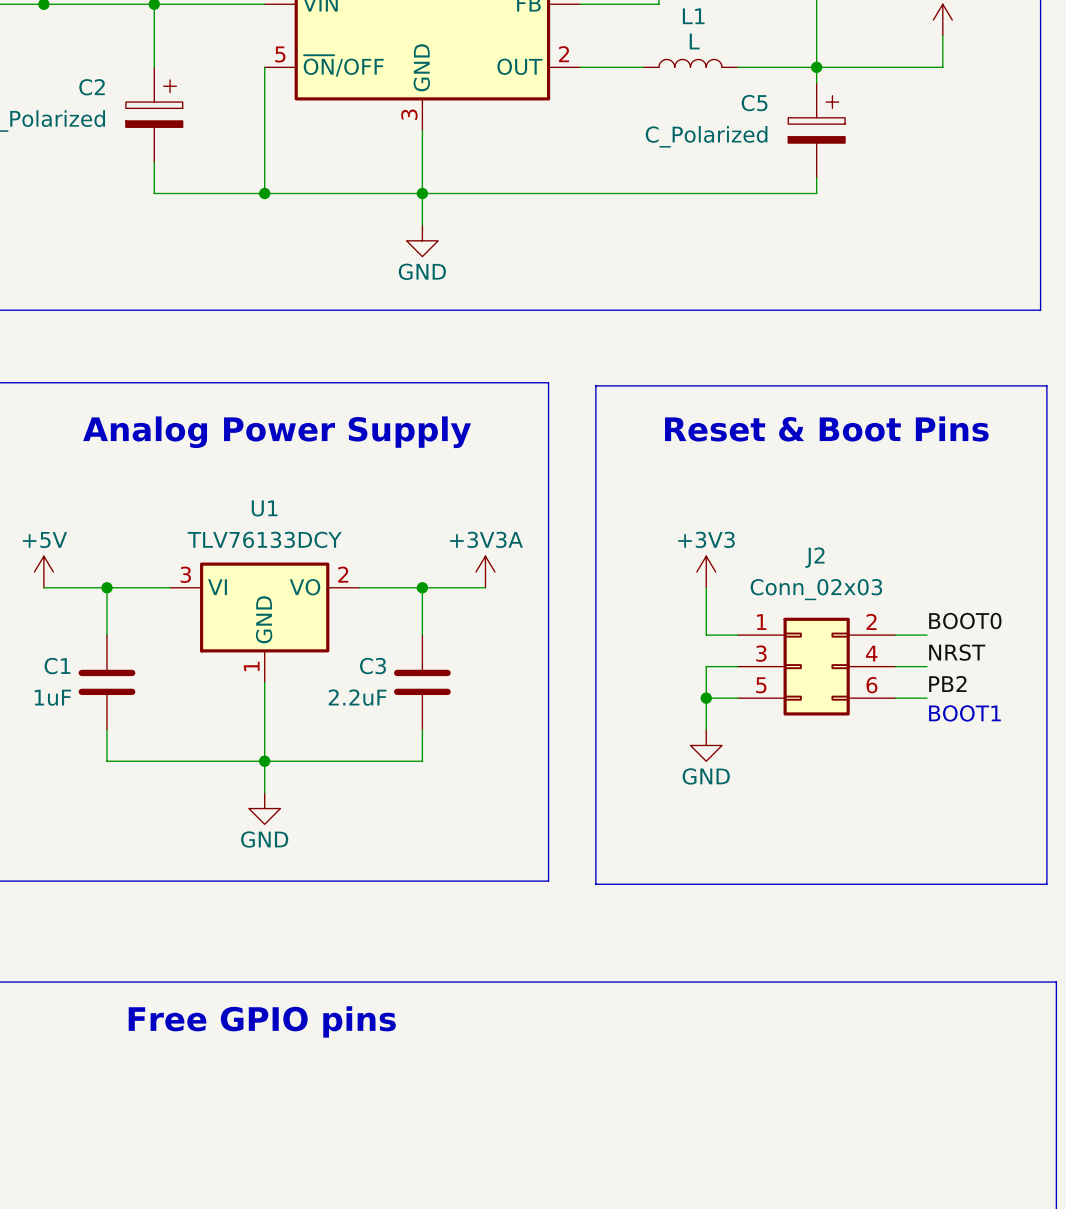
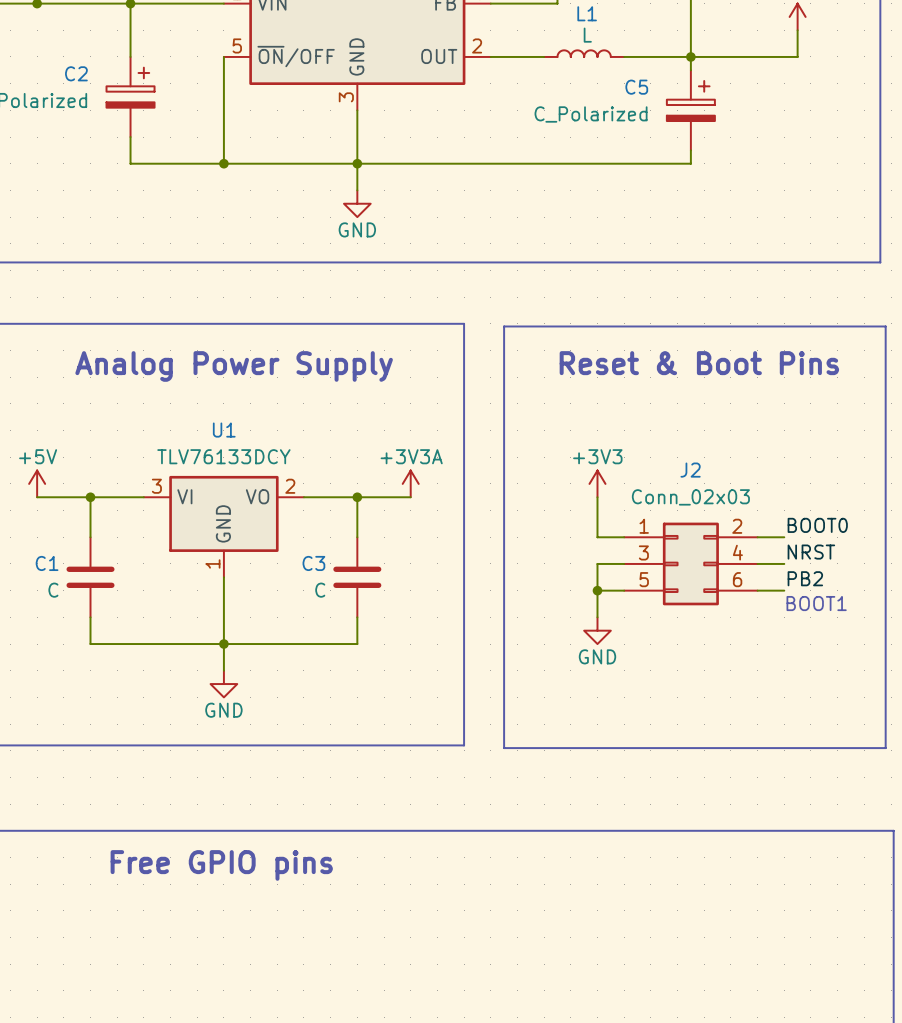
C1 value: 1uF (52, 697) -> C (53, 590)
C3 value: 2.2uF (357, 697) -> C (320, 590)

